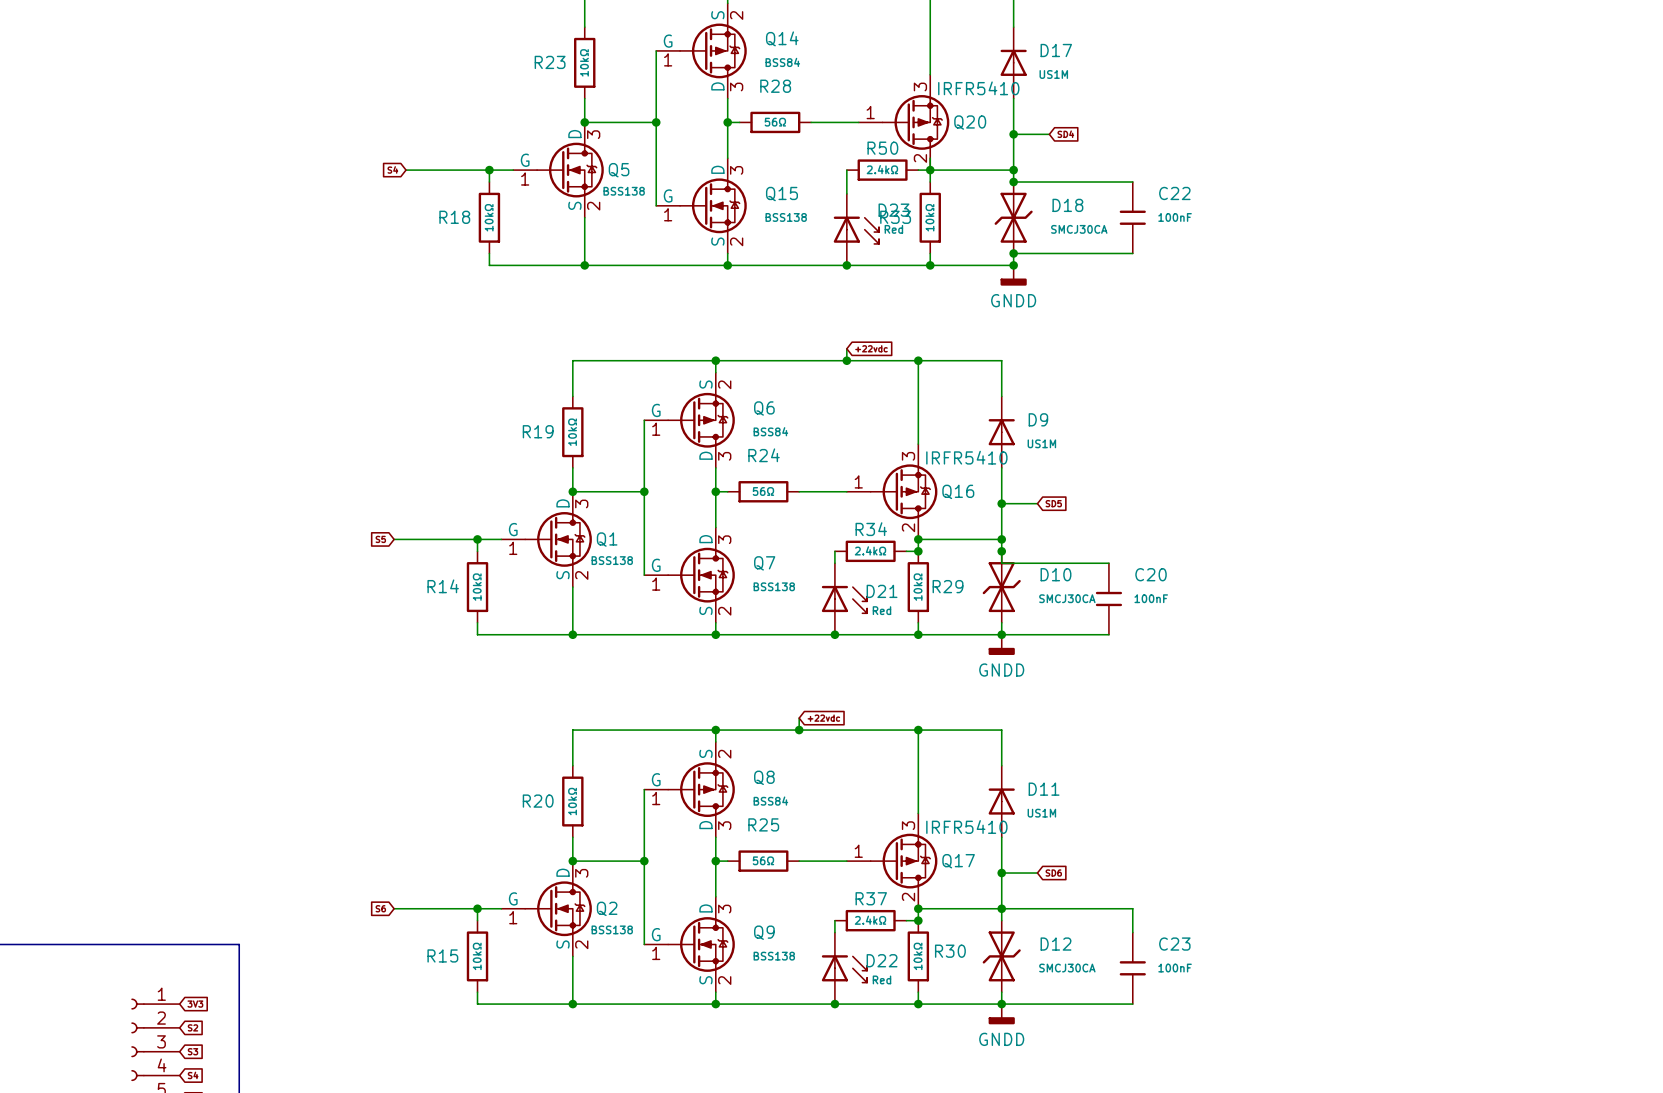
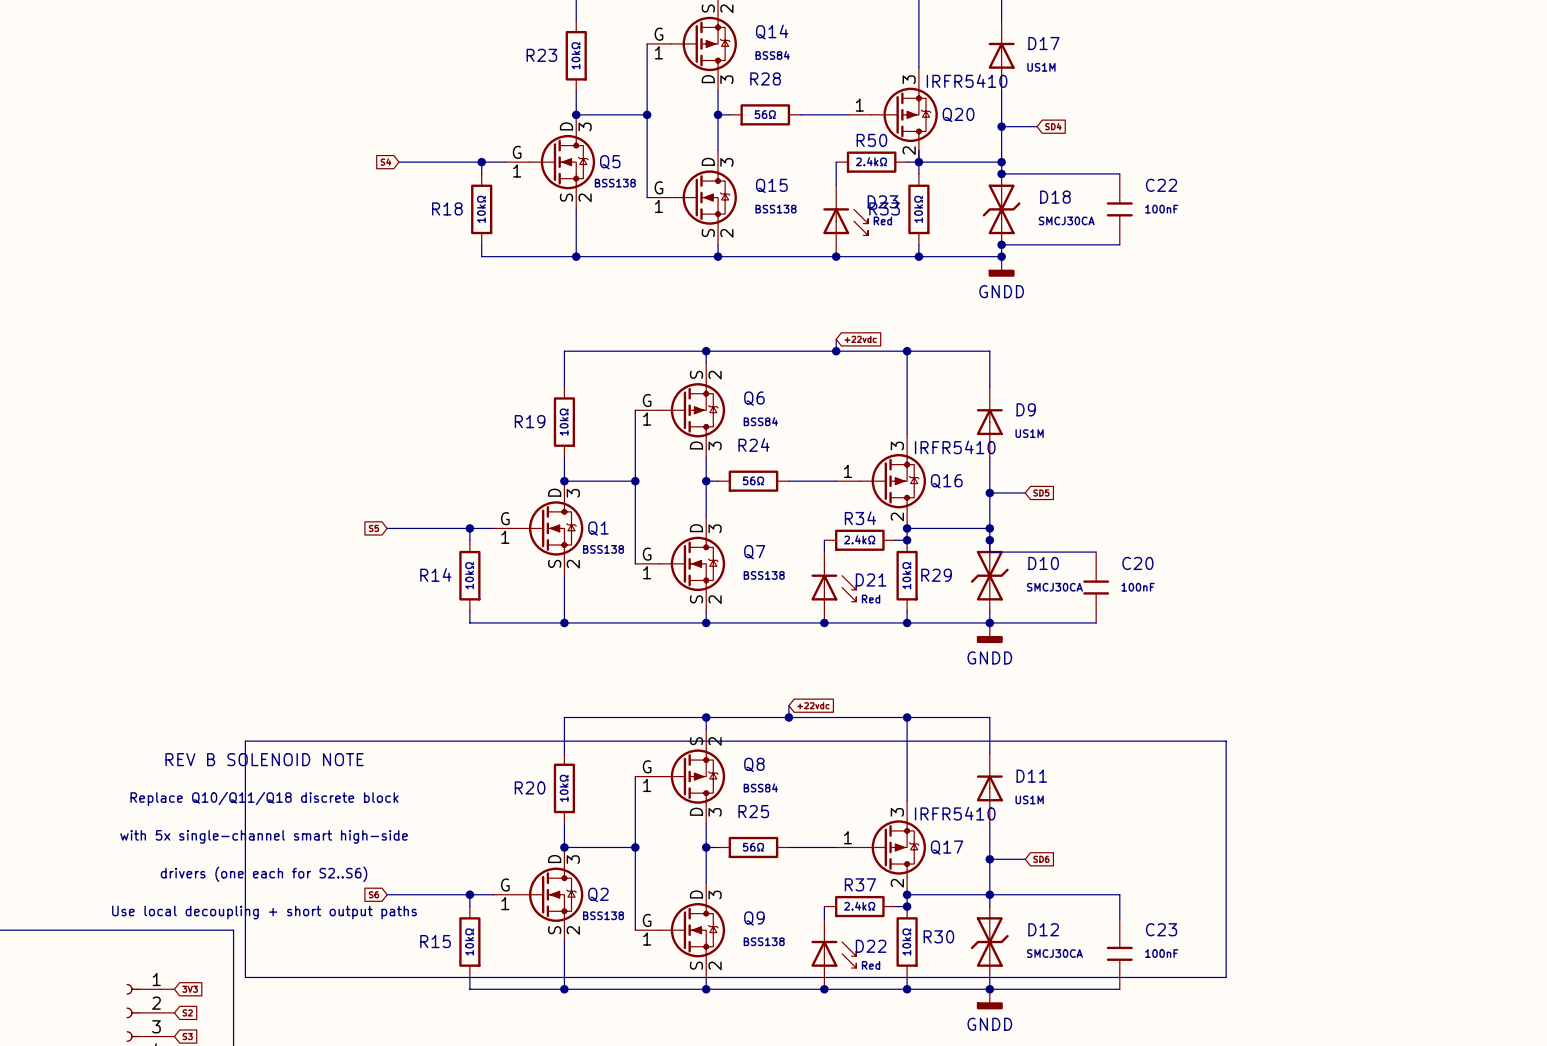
line: none -> (245, 741) (1226, 741) (1226, 977) (245, 977) (245, 741)
text: none -> REV B SOLENOID NOTE (264, 759)
text: none -> Replace Q10/Q11/Q18 discrete block (264, 798)
text: none -> with 5x single-channel smart high-side (264, 836)
text: none -> drivers (one each for S2..S6) (264, 874)
text: none -> Use local decoupling + short output paths (264, 912)

